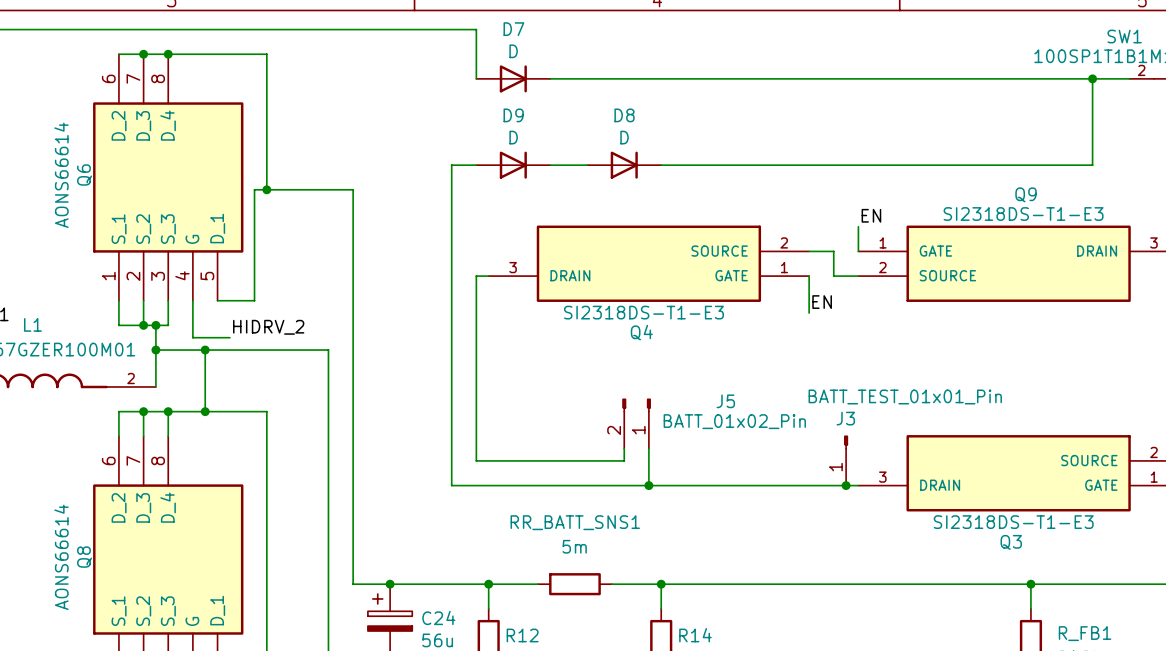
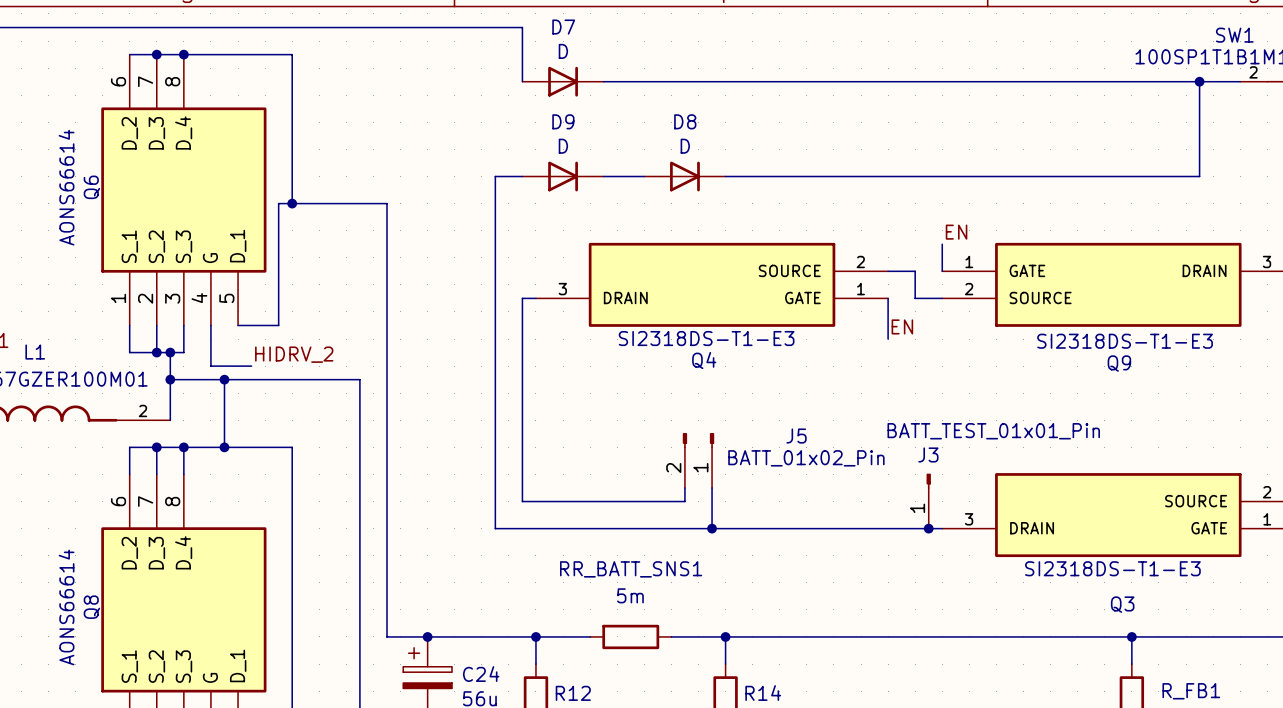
Q9 name position: Q9 (1026, 194) -> Q9 (1119, 363)
Q9 value position: SI2318DS-T1-E3 (1023, 213) -> SI2318DS-T1-E3 (1125, 341)
Q3 name position: Q3 (1011, 542) -> Q3 (1122, 604)

